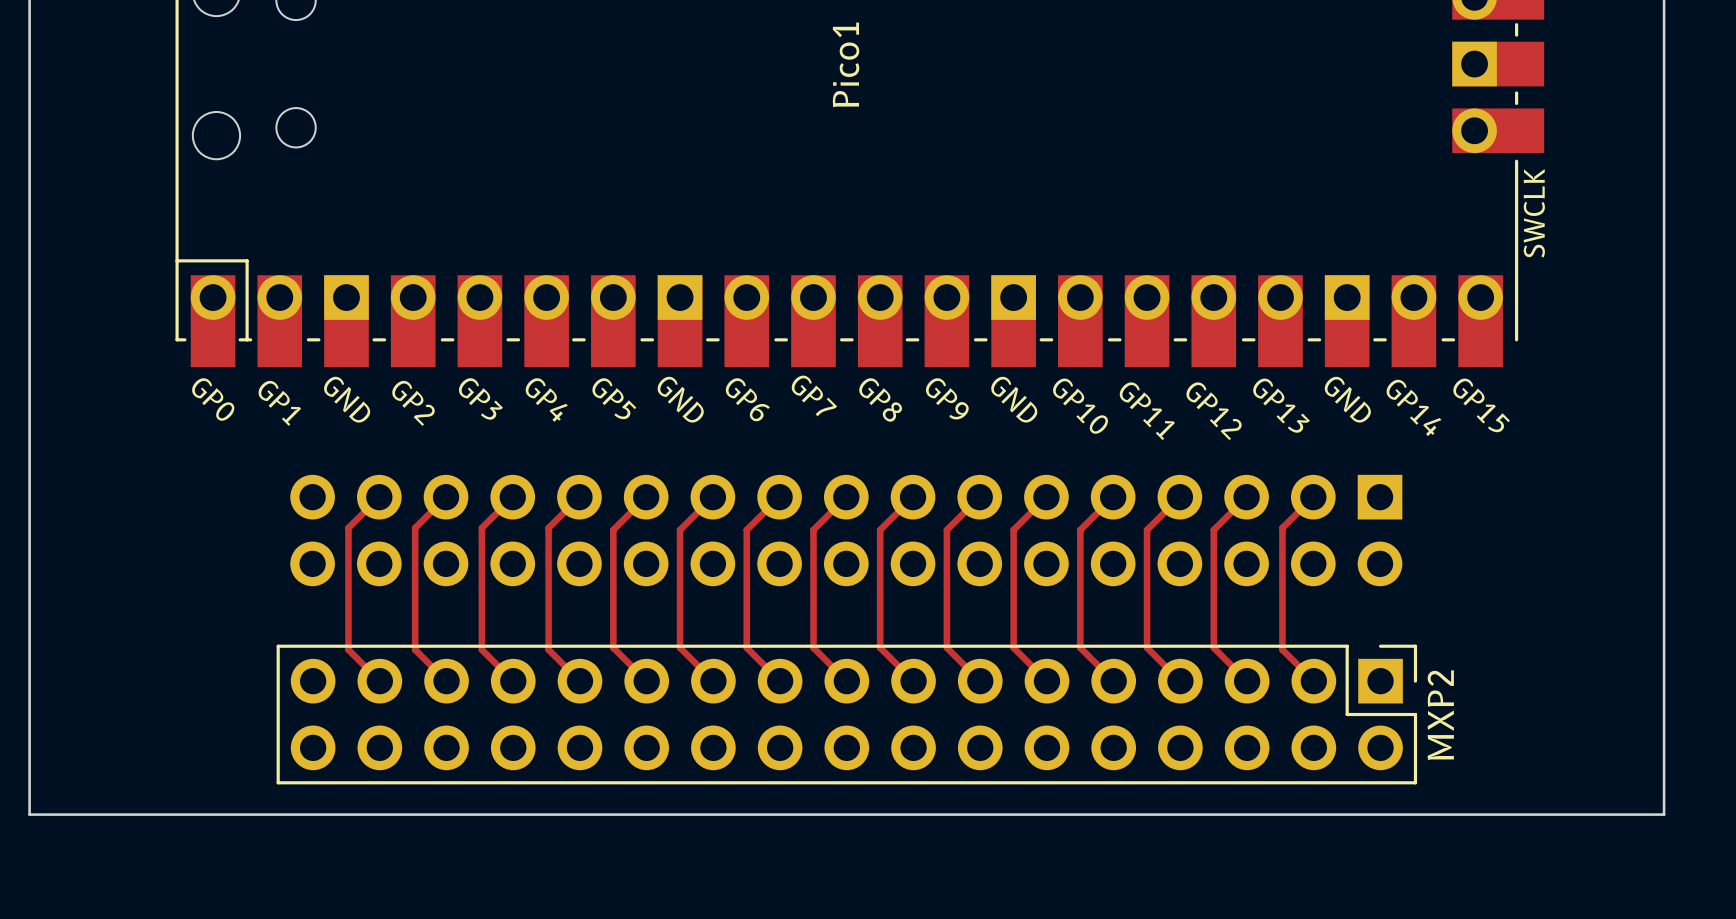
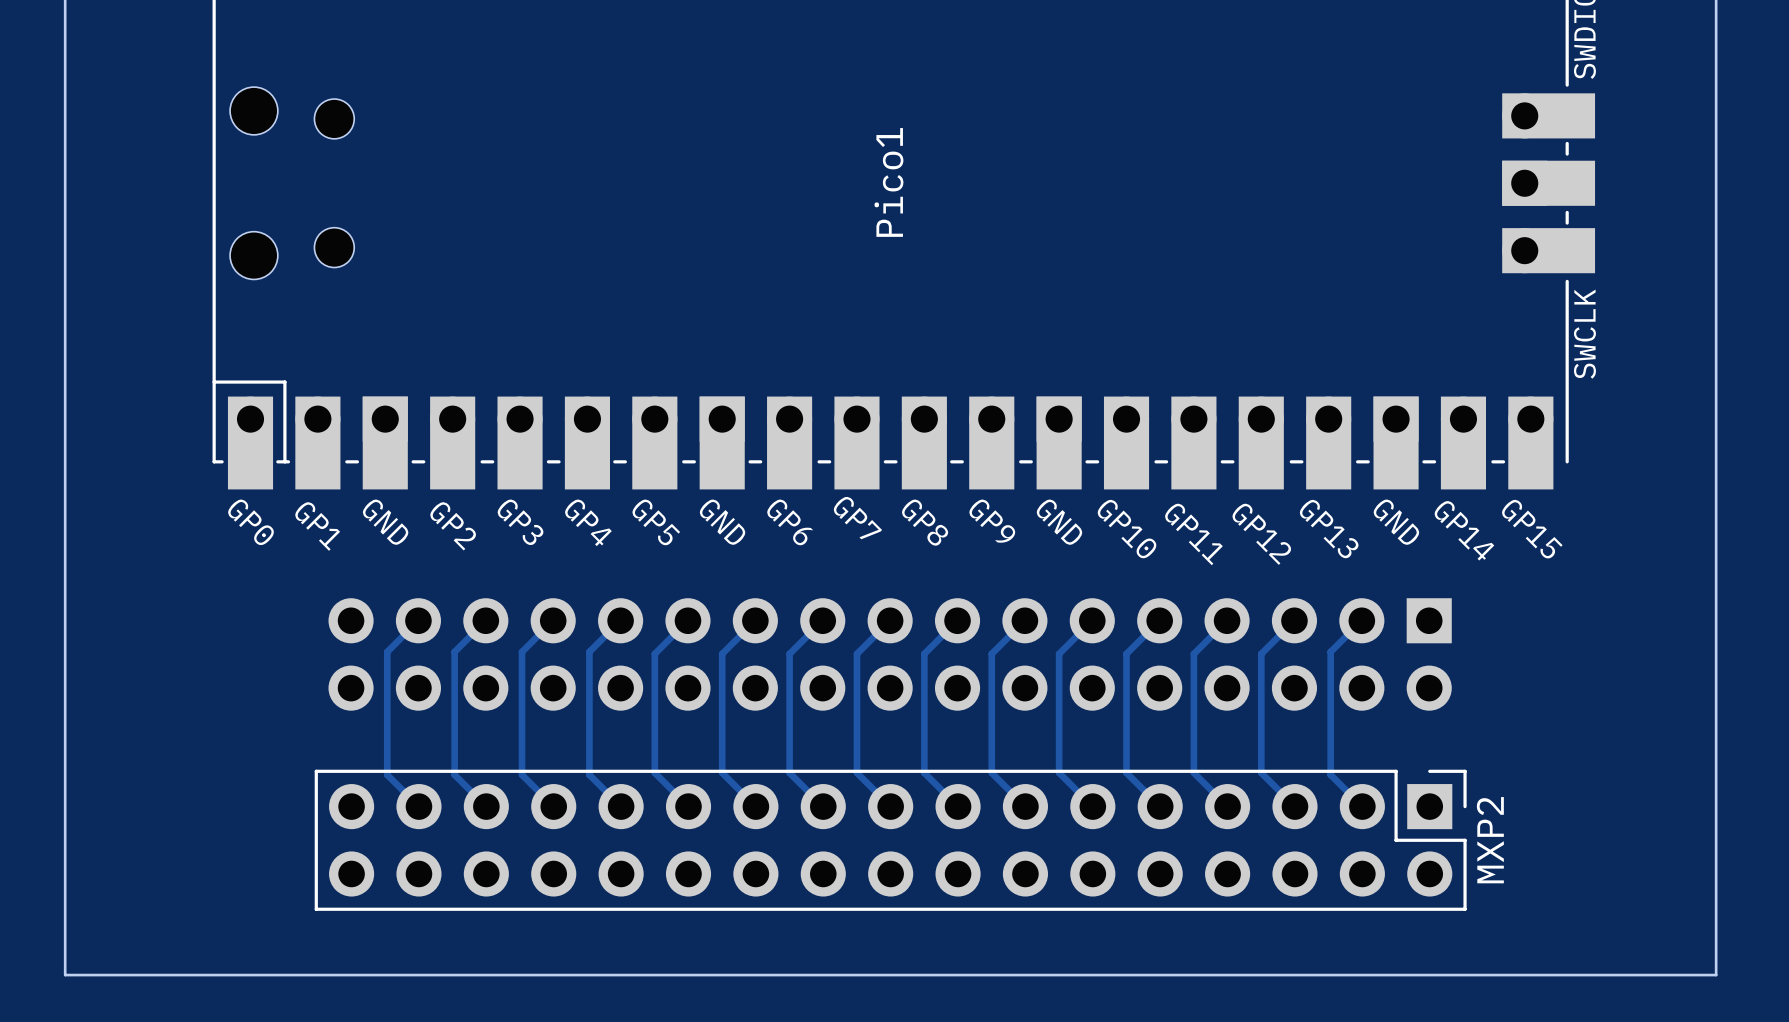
board edge: (29, 814) (1664, 814) -> (65, 941) (65, 975) (1716, 975) (1716, 941)

